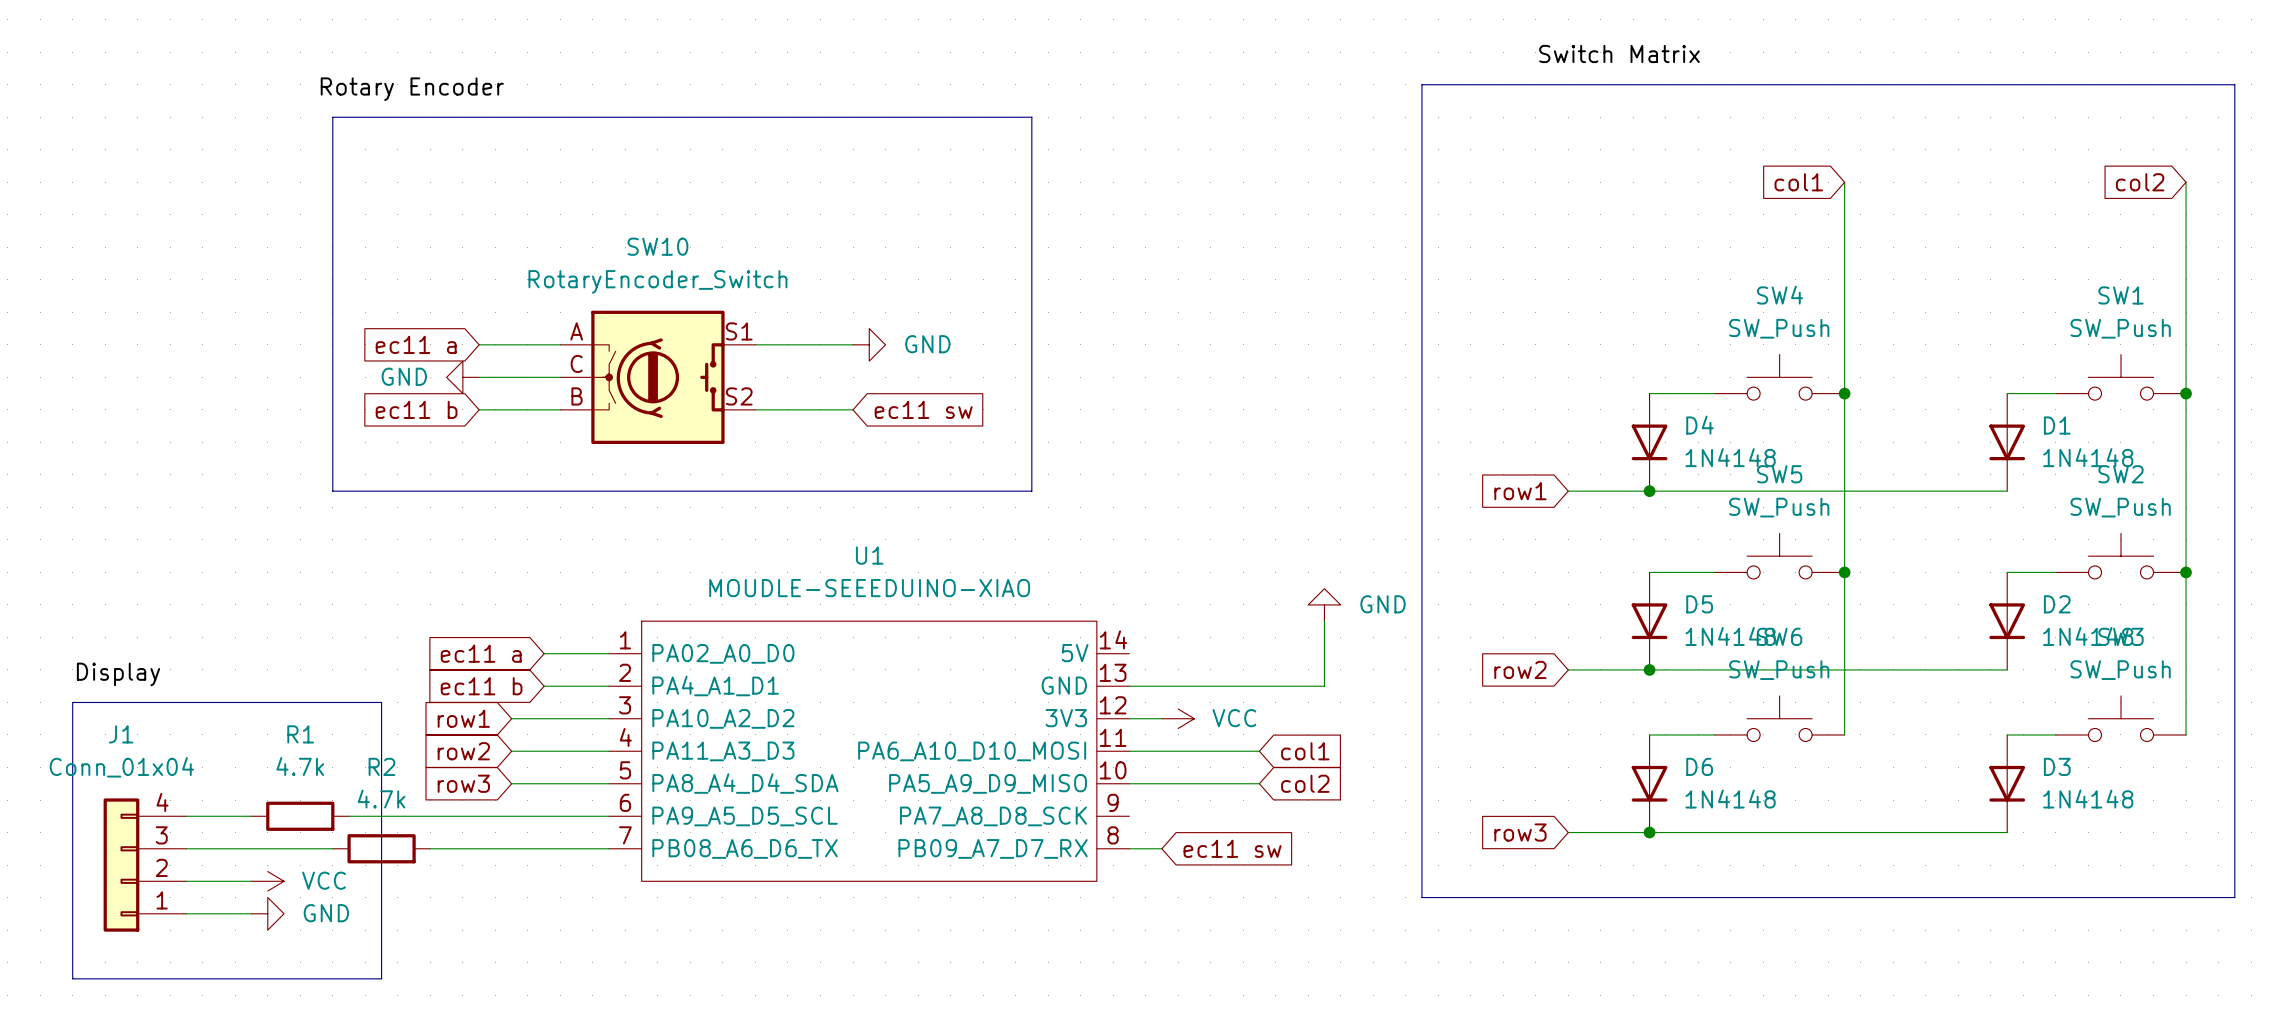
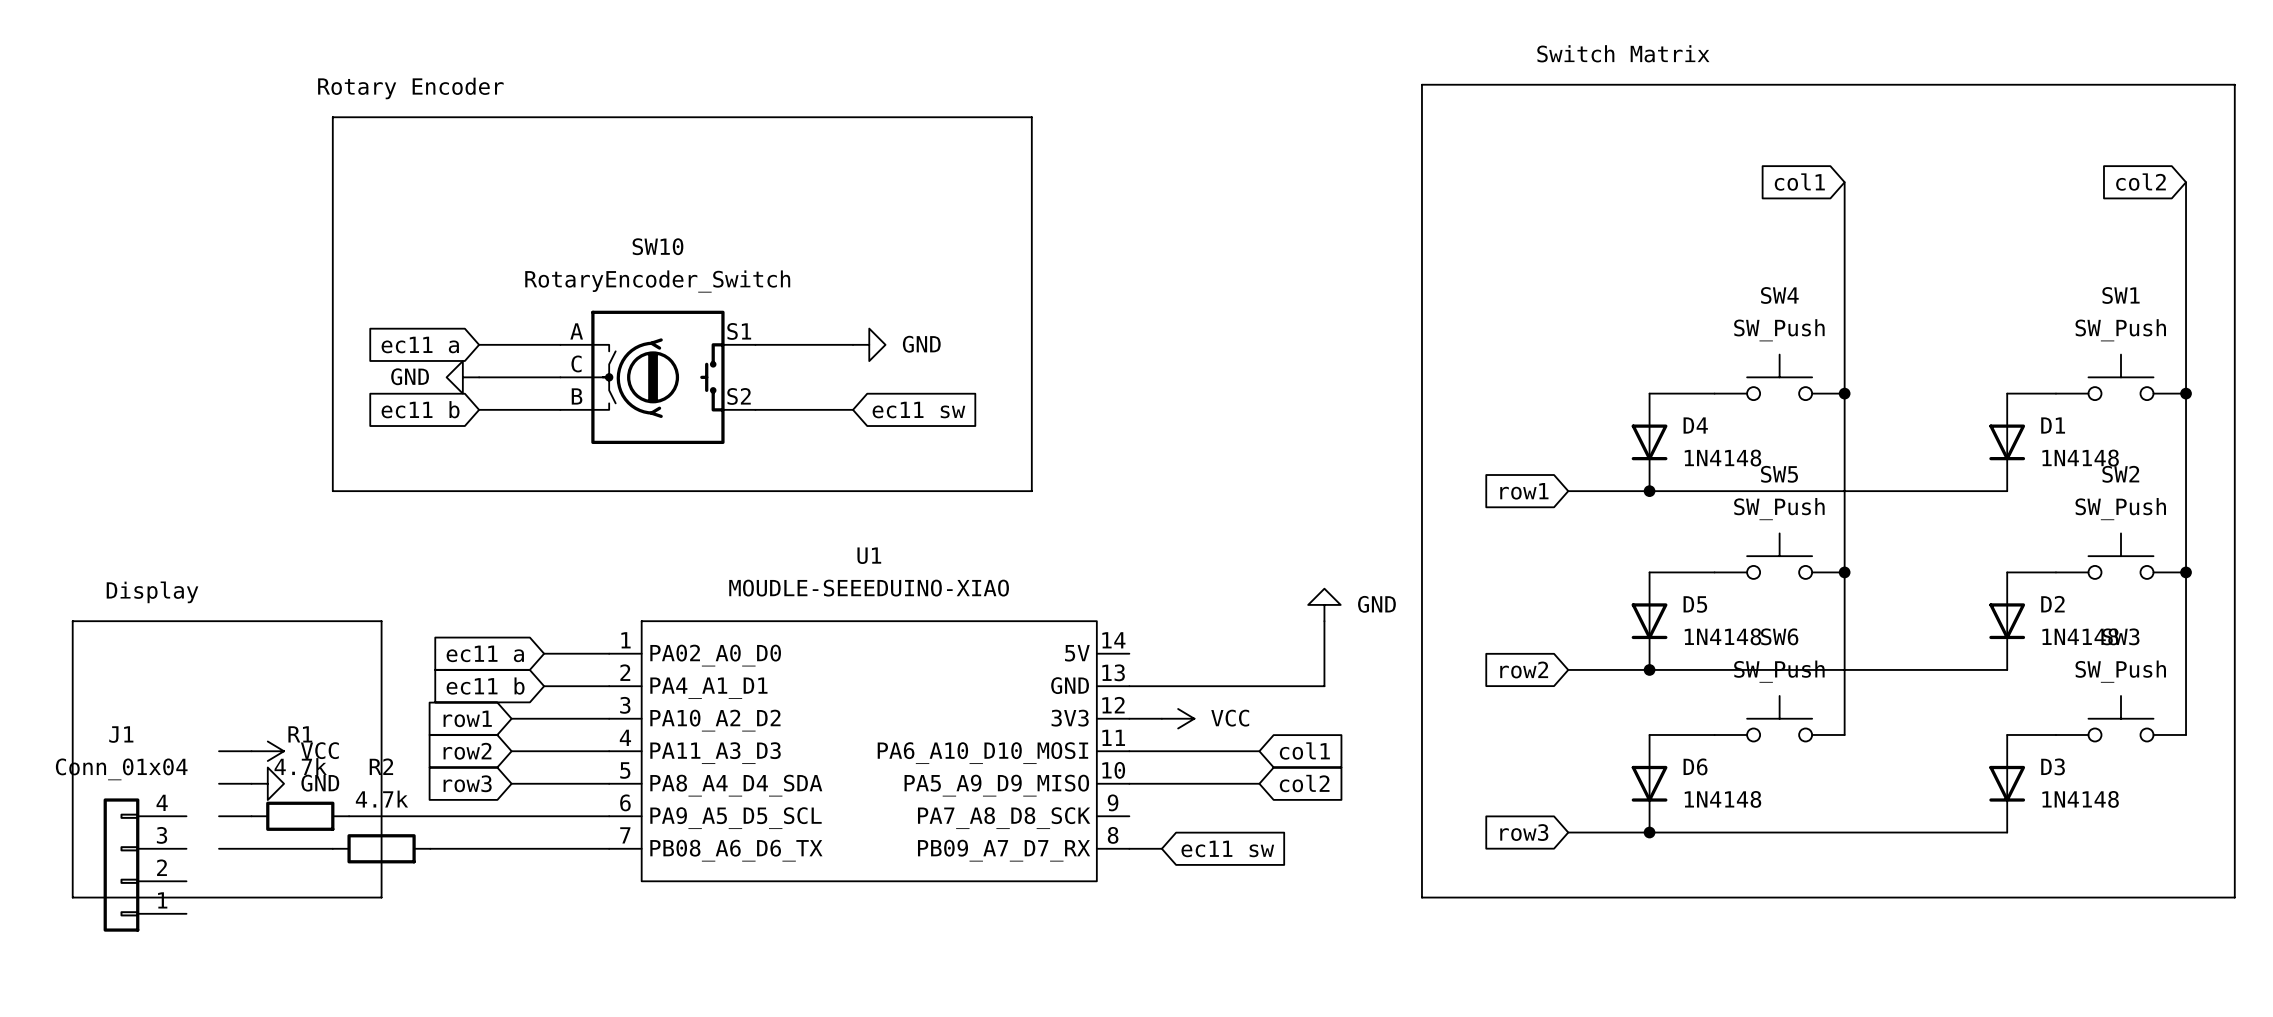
label position: Display (118, 674) -> Display (152, 592)
line: (72, 702) (381, 702) -> (72, 702) (72, 621) (381, 621) (381, 702)
wire: (186, 816) (219, 816) -> (219, 751) (251, 751)
wire: (186, 848) (219, 848) -> (219, 783) (251, 783)
wire: (186, 881) (251, 881) -> none
power symbol position: VCC (267, 881) -> VCC (267, 751)
line: (72, 897) (72, 978) (381, 978) (381, 897) -> (72, 897) (381, 897)
wire: (186, 913) (251, 913) -> none
power symbol position: GND (267, 913) -> GND (267, 783)

